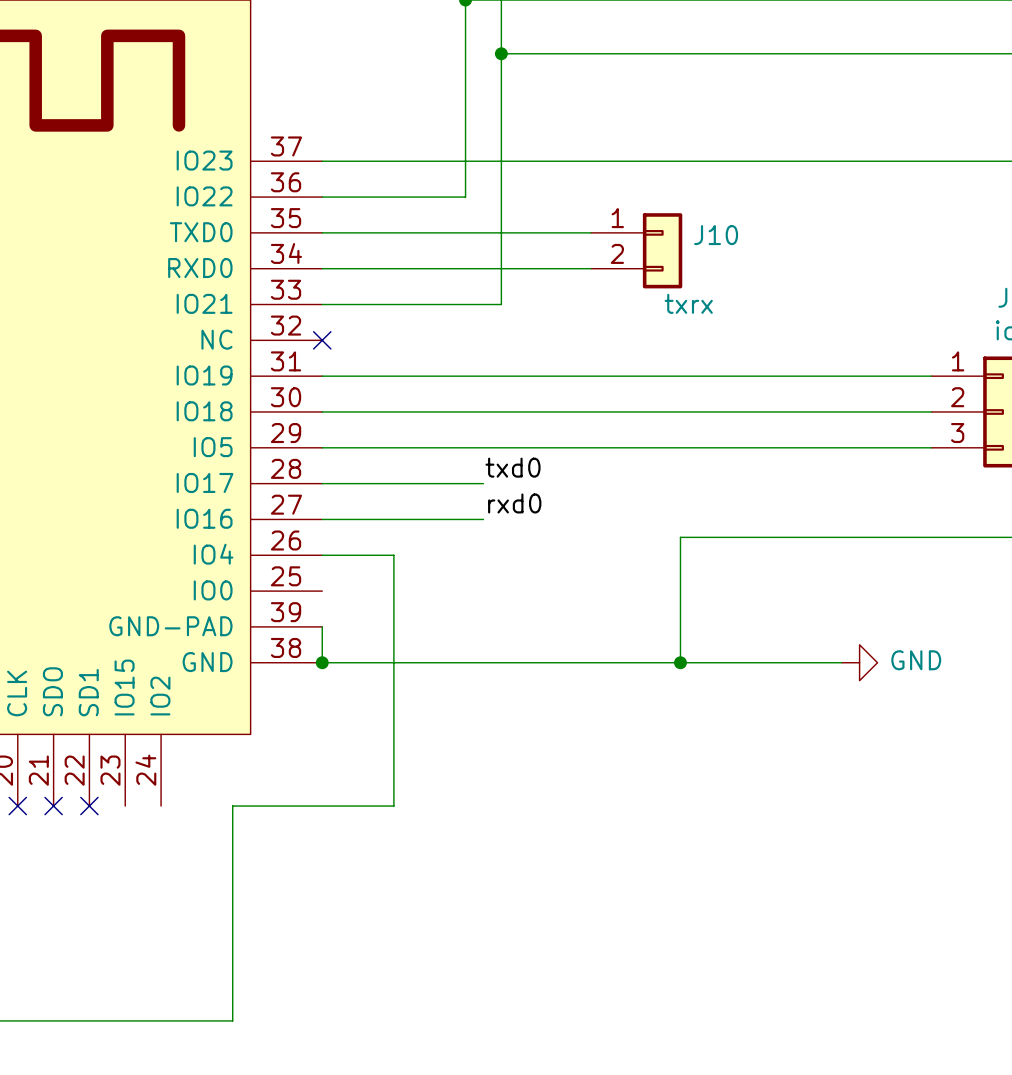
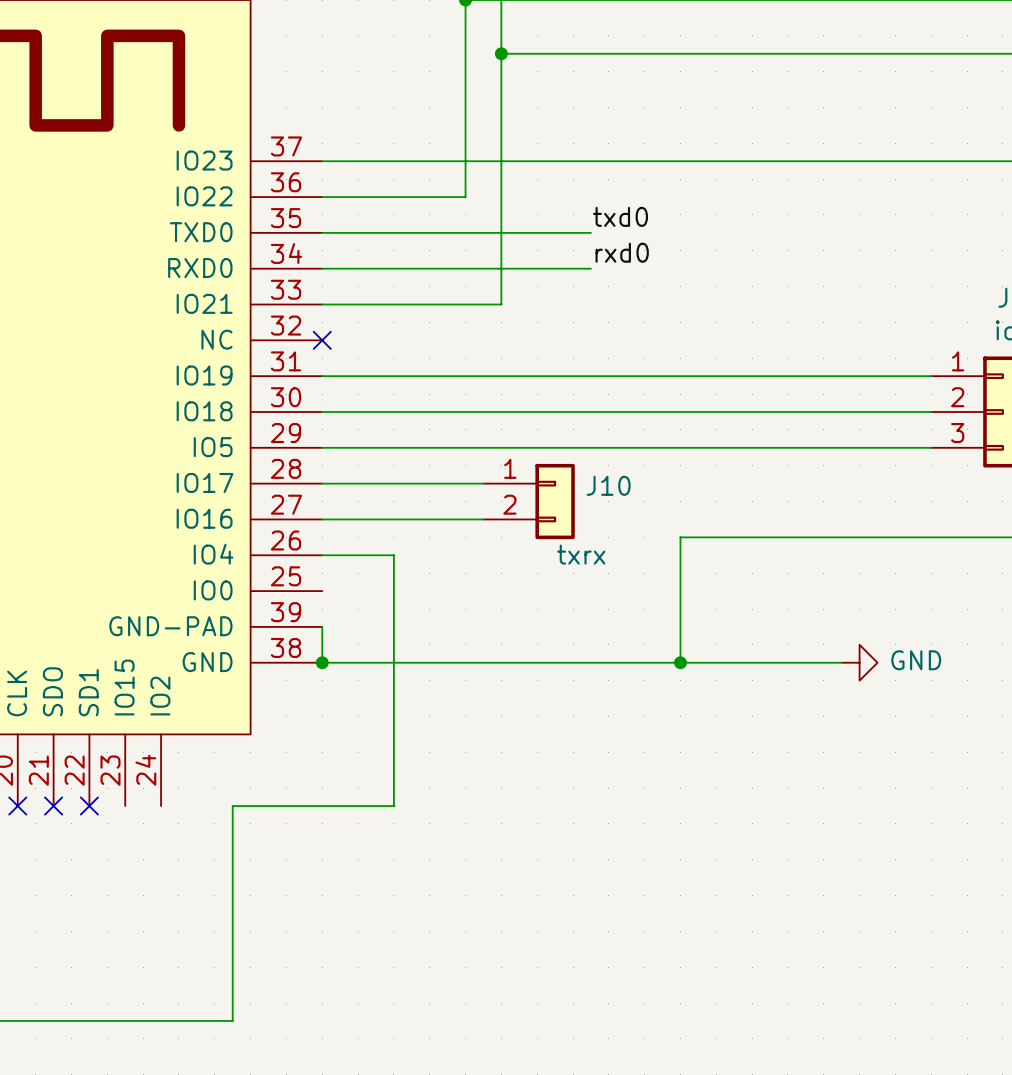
J10 position: (636, 250) -> (529, 501)
label position: txd0 (513, 467) -> txd0 (620, 216)
label position: rxd0 (514, 503) -> rxd0 (622, 252)

